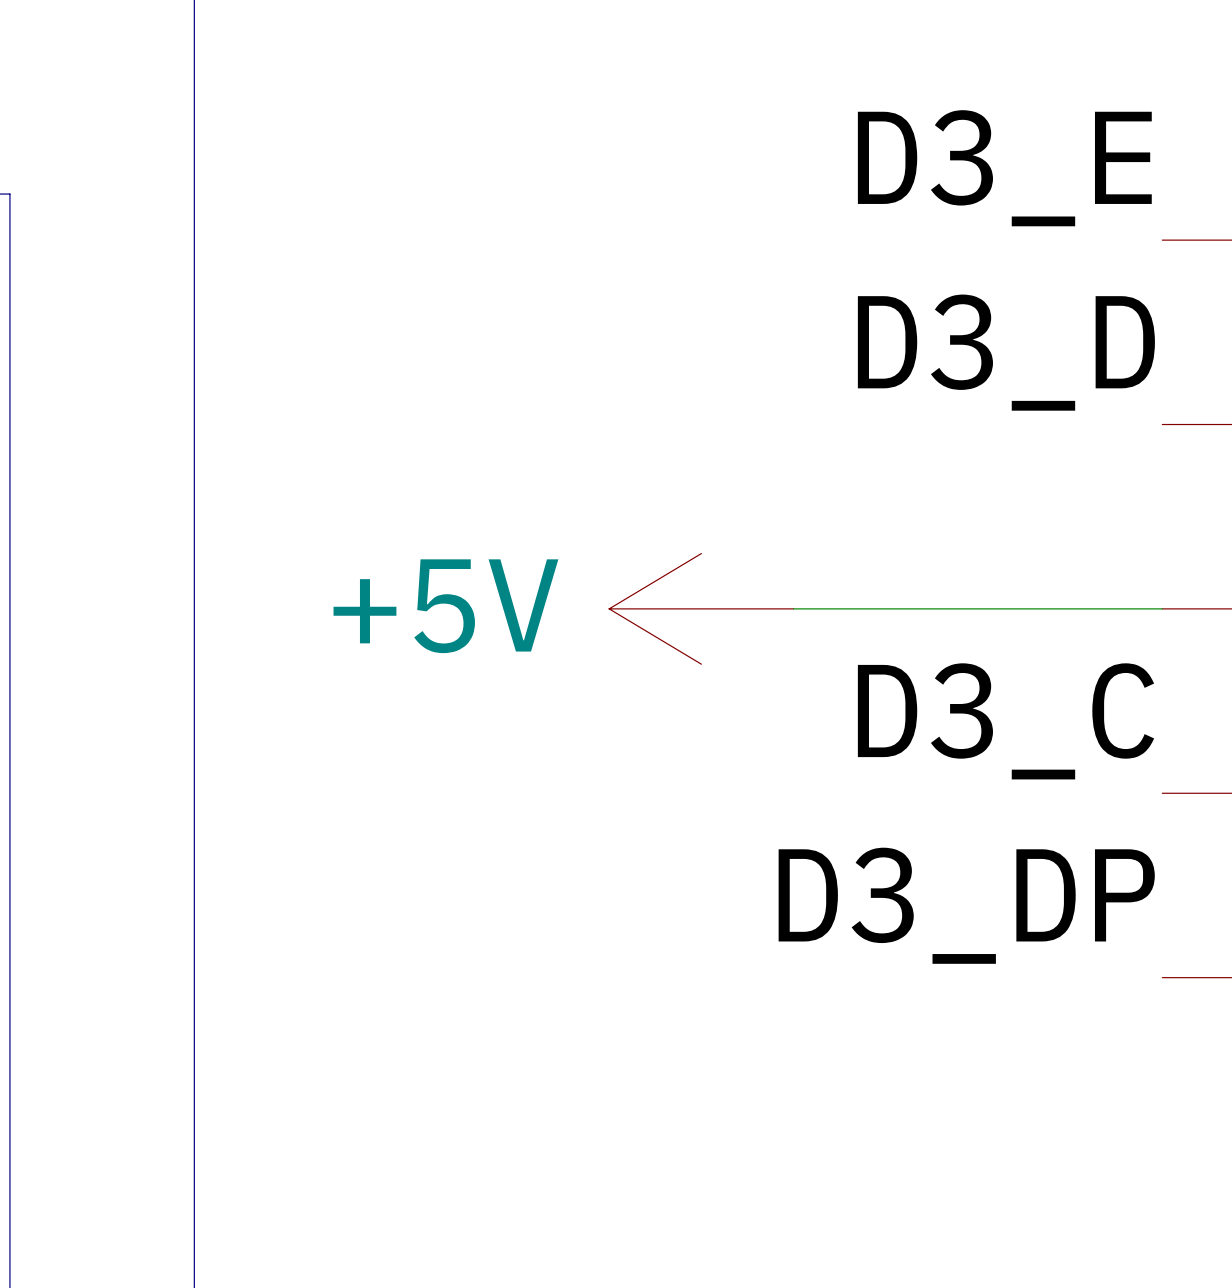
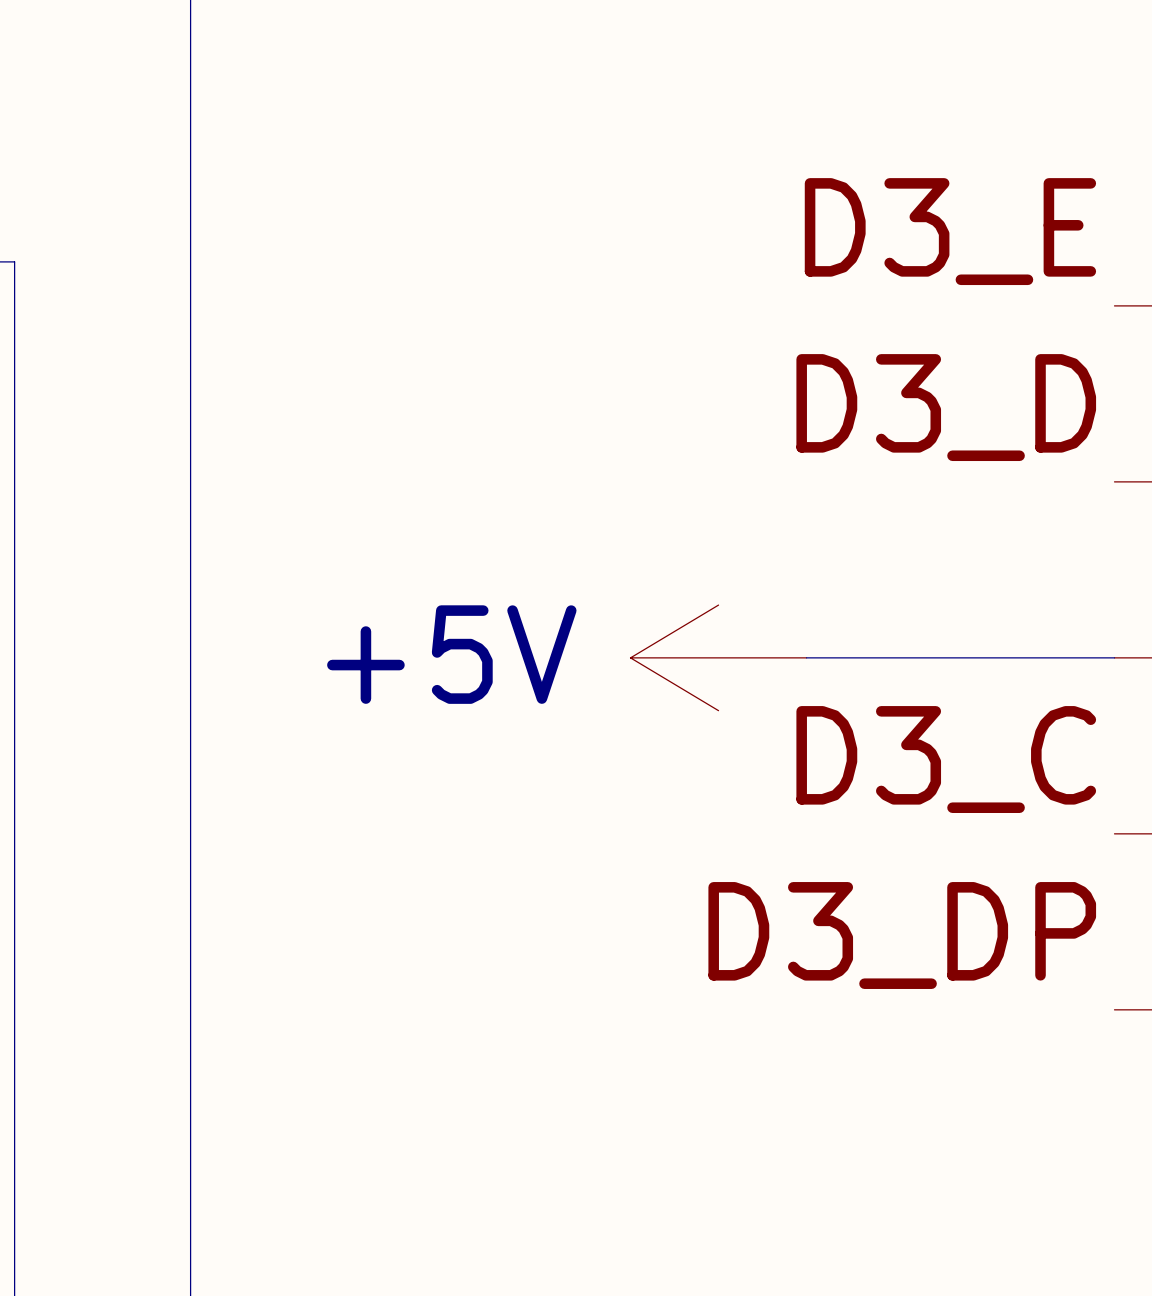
power symbol position: +5V (701, 608) -> +5V (718, 657)

